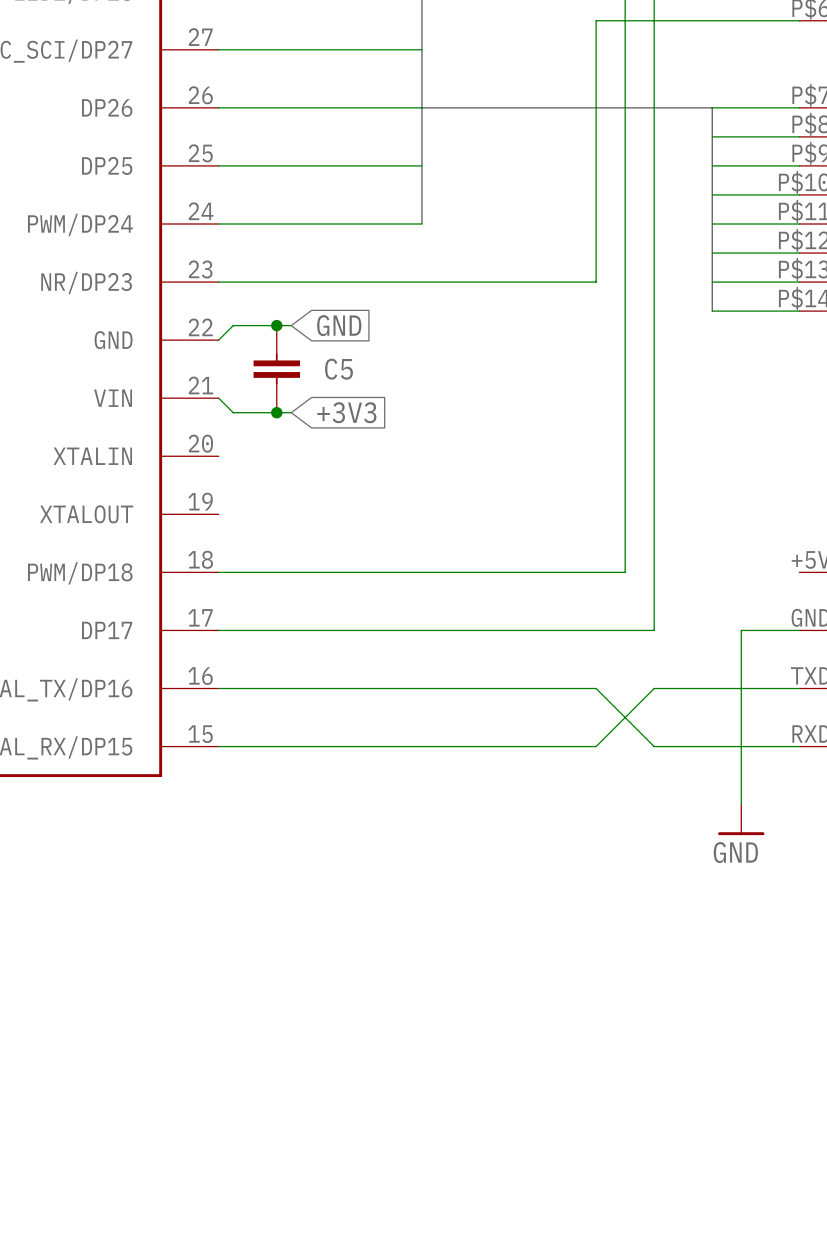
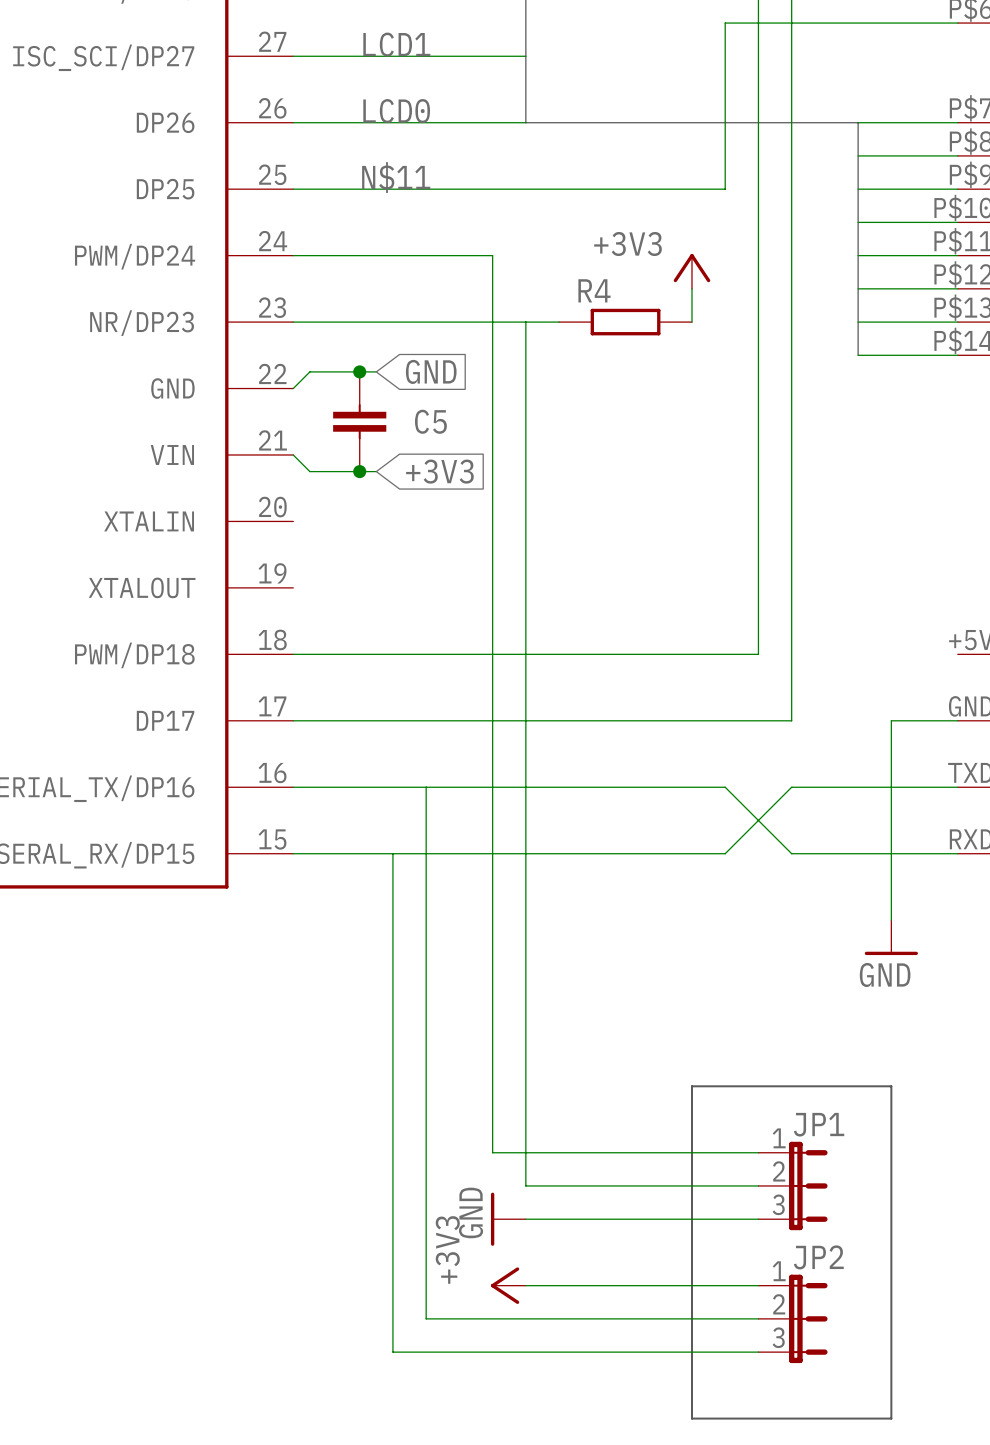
label: none -> LCD1 (396, 44)
label: none -> LCD0 (396, 111)
bus: (421, 107) (421, 223) -> none
label: none -> N$11 (396, 177)
wire: (596, 165) (596, 282) (450, 282) -> (725, 189) (525, 189)
wire: (392, 223) (421, 223) -> (492, 255) (492, 1152) (758, 1152)
power symbol: none -> +3V3 (691, 271)
wire: none -> (691, 288) (691, 322)
wire: none -> (525, 322) (525, 1185) (758, 1185)
R4: none -> (625, 322)
wire: none -> (426, 787) (426, 1318) (758, 1318)
wire: none -> (392, 853) (392, 1352) (758, 1352)
line: none -> (691, 1086) (891, 1086) (891, 1418) (691, 1418) (691, 1086)
JP1: none -> (793, 1185)
power symbol: none -> GND (508, 1219)
wire: none -> (525, 1219) (758, 1219)
power symbol: none -> +3V3 (508, 1285)
wire: none -> (525, 1285) (758, 1285)
JP2: none -> (793, 1318)

